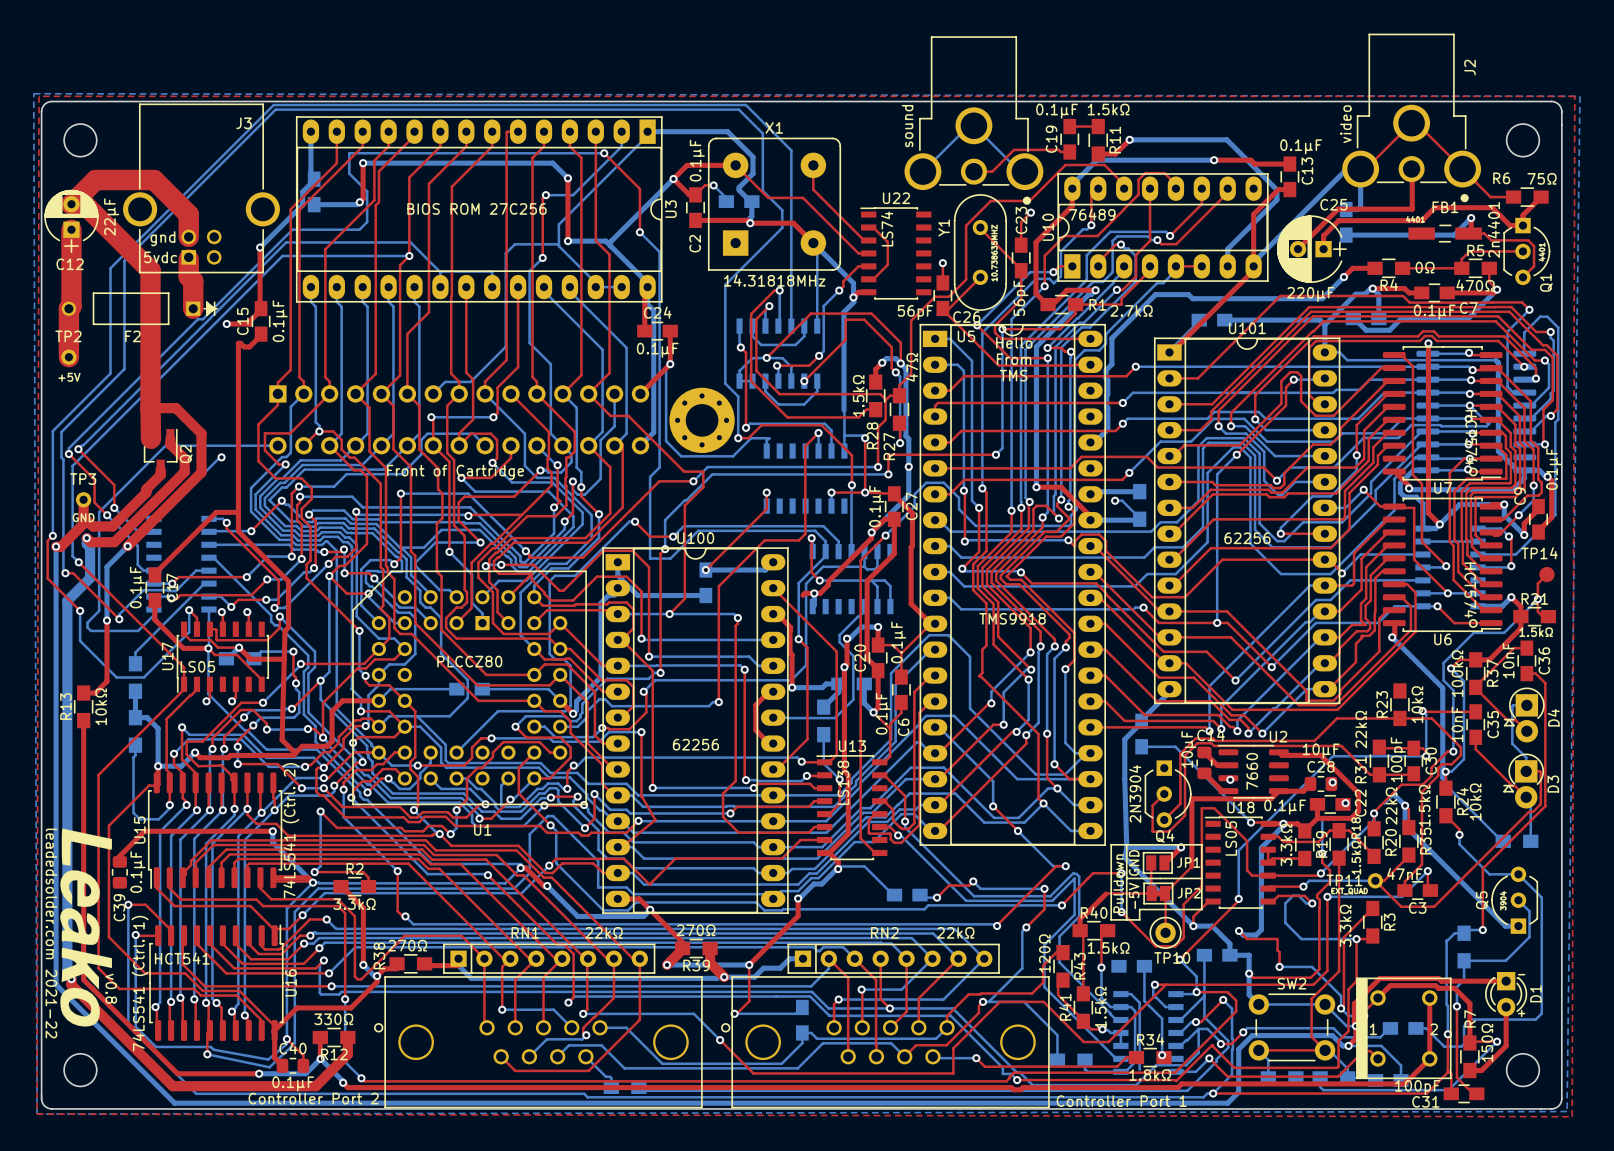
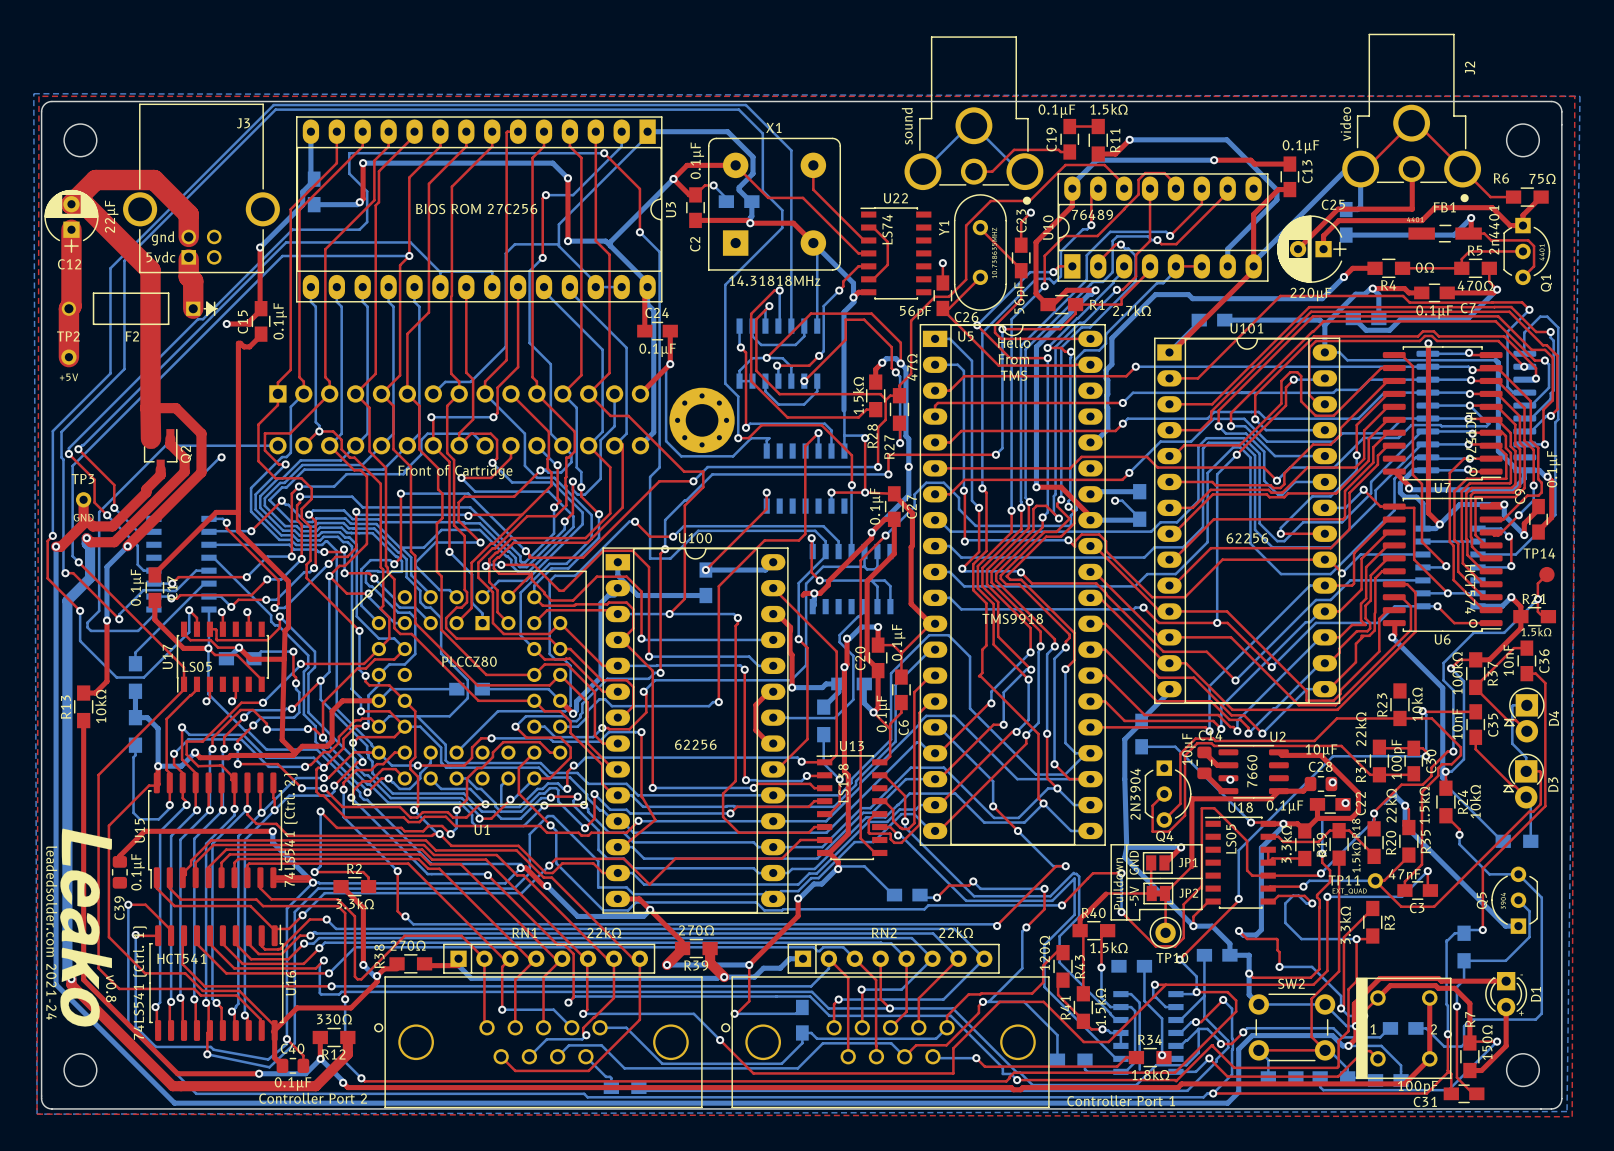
text: leadedsolder.com 2021-22 (51, 933) -> leadedsolder.com 2021-24 (51, 933)

